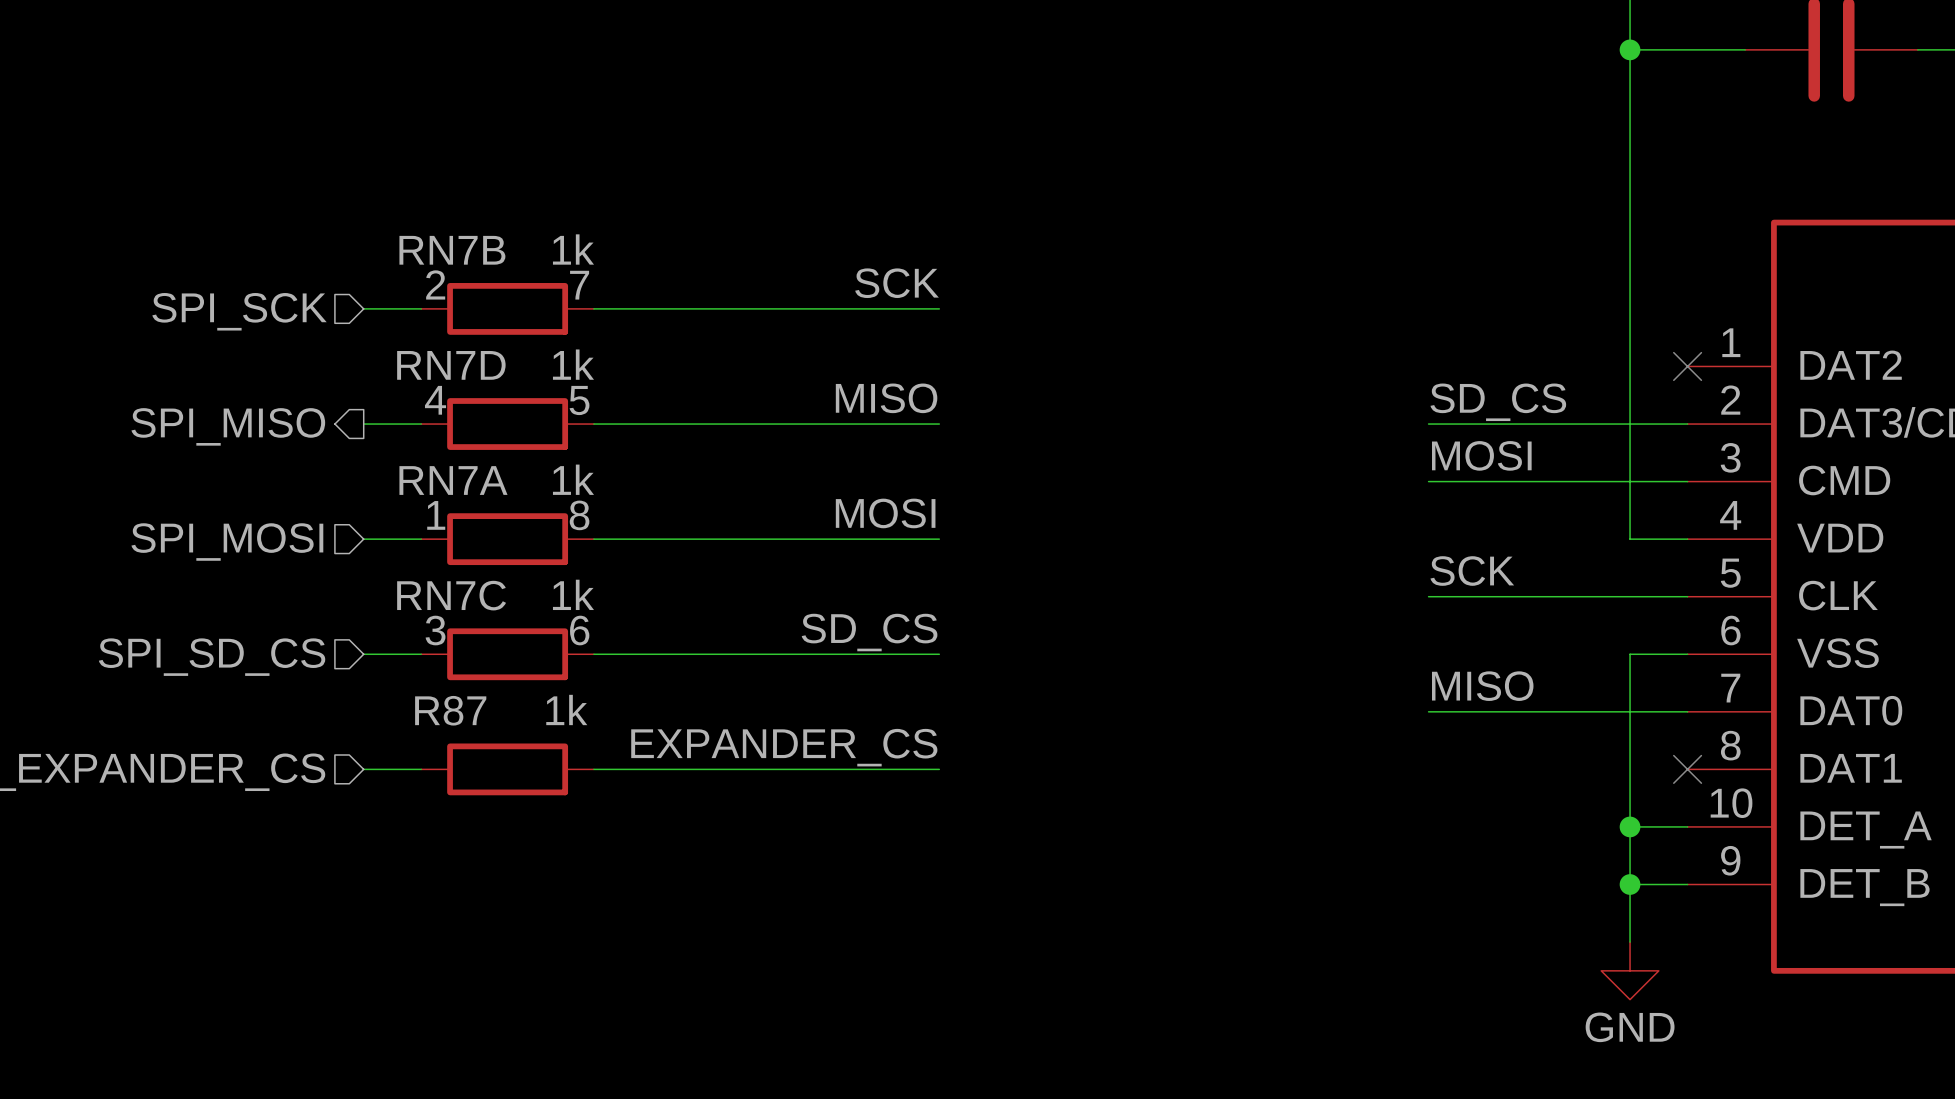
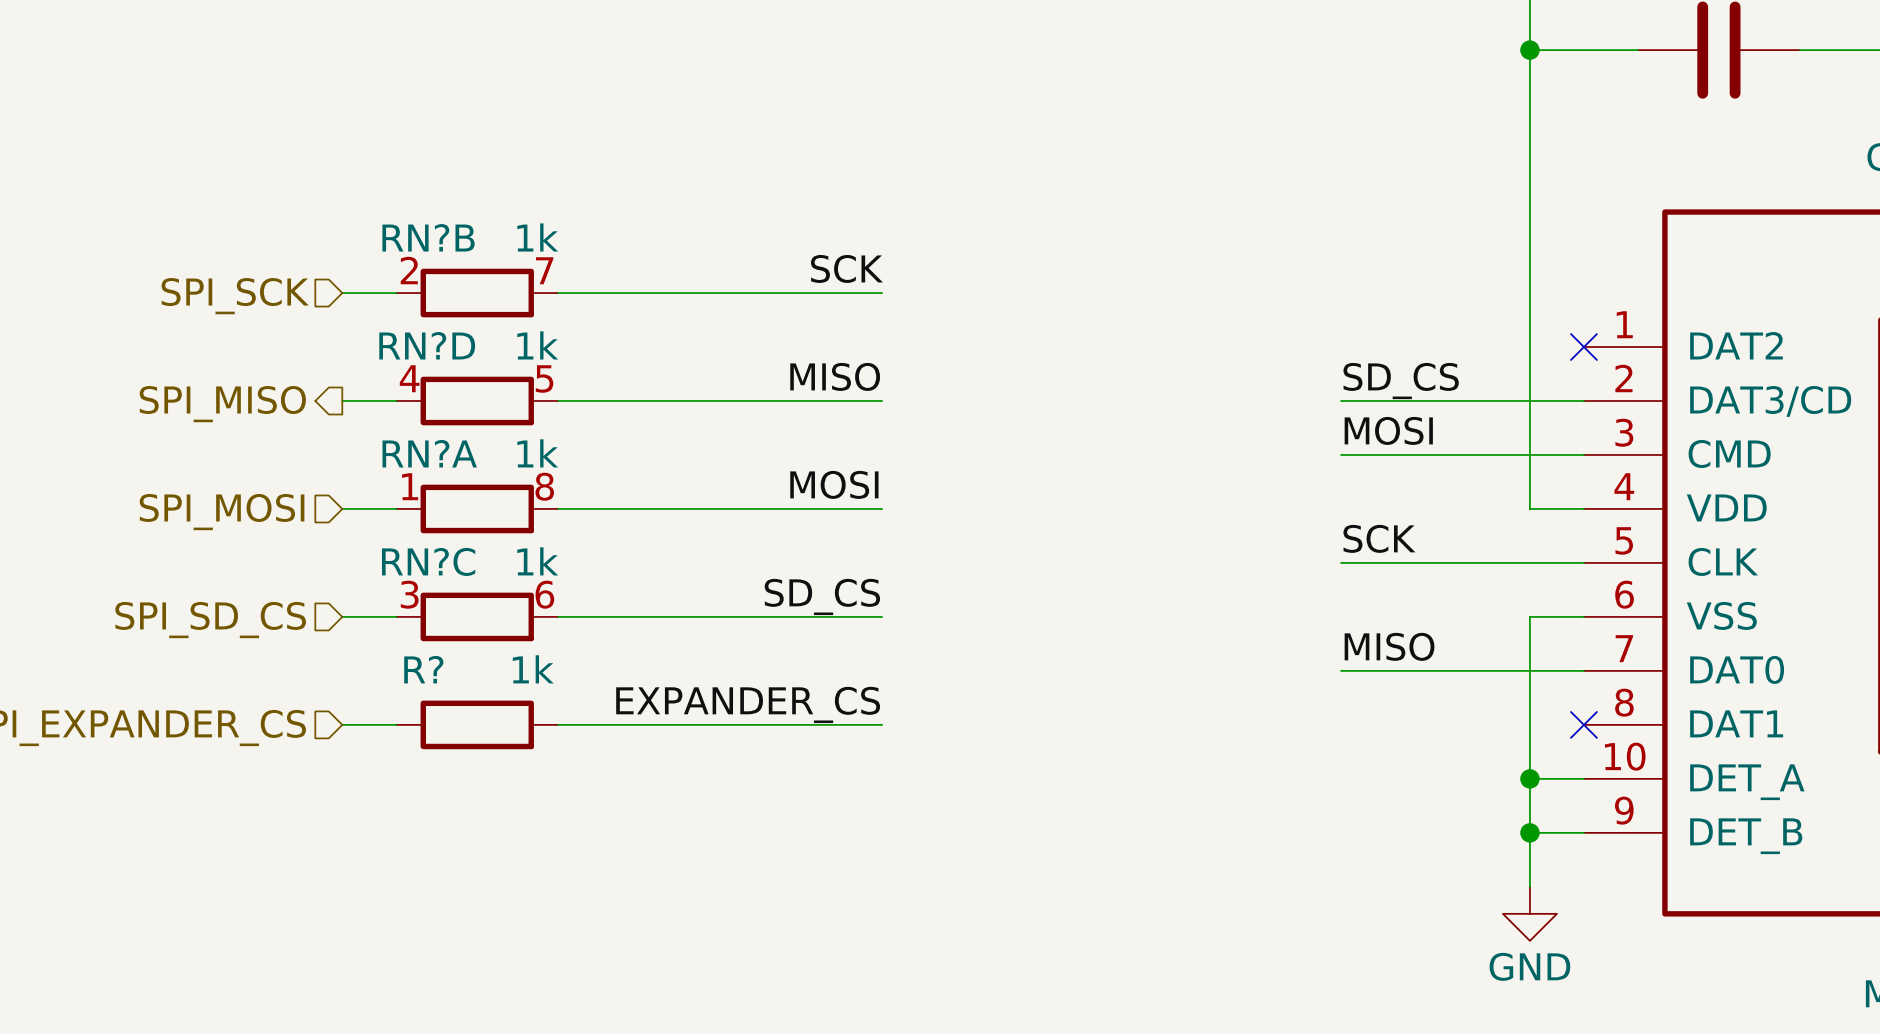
RN7B name: RN7B (452, 250) -> RN?B (428, 237)
RN7D name: RN7D (451, 365) -> RN?D (427, 345)
RN7A name: RN7A (453, 480) -> RN?A (429, 453)
RN7C name: RN7C (451, 595) -> RN?C (428, 561)
R87 name: R87 (450, 710) -> R? (423, 669)

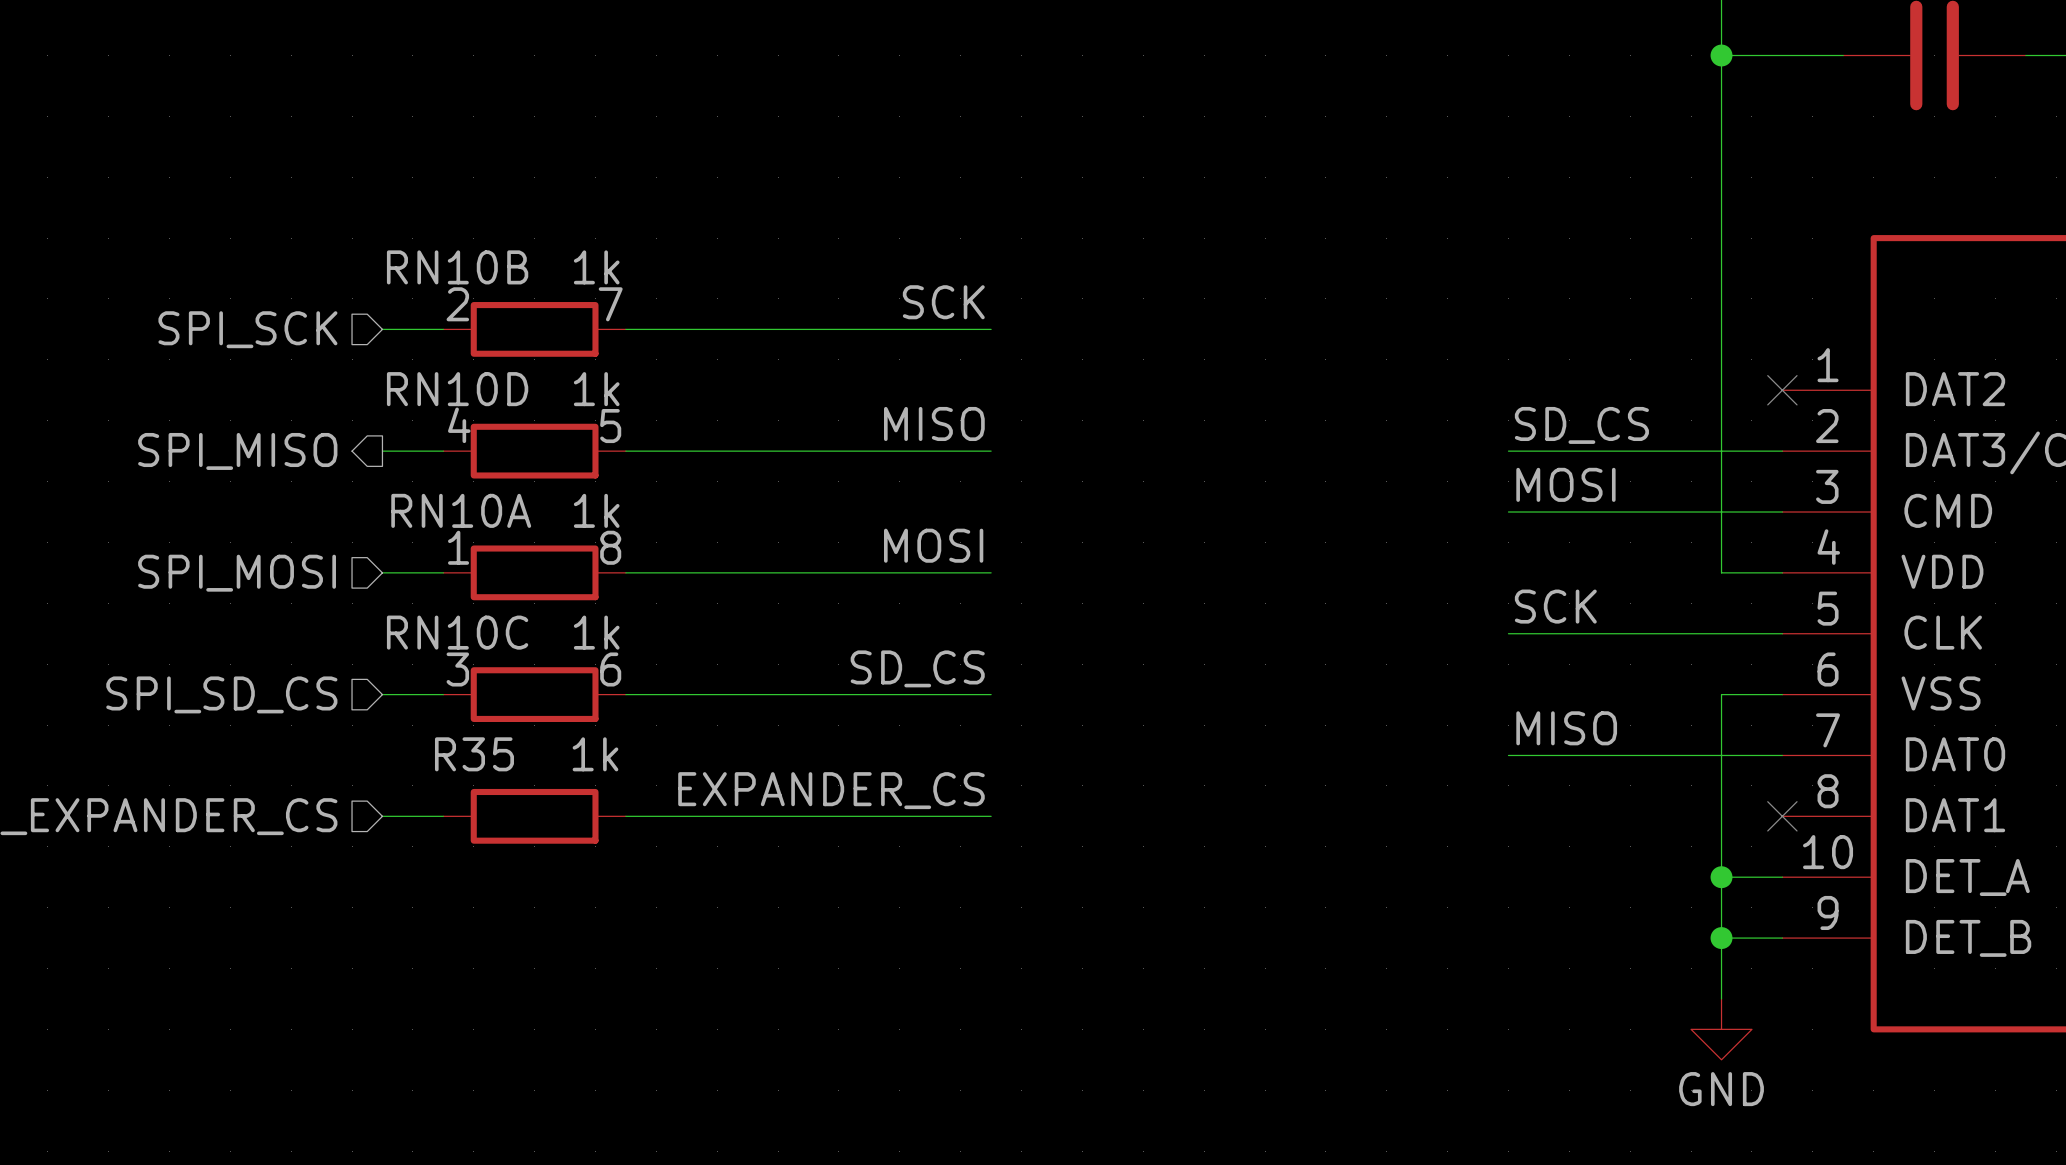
RN?B name: RN?B (428, 237) -> RN10B (457, 267)
RN?D name: RN?D (427, 345) -> RN10D (457, 389)
RN?A name: RN?A (429, 453) -> RN10A (461, 510)
RN?C name: RN?C (428, 561) -> RN10C (457, 632)
R? name: R? (423, 669) -> R35 (474, 754)

